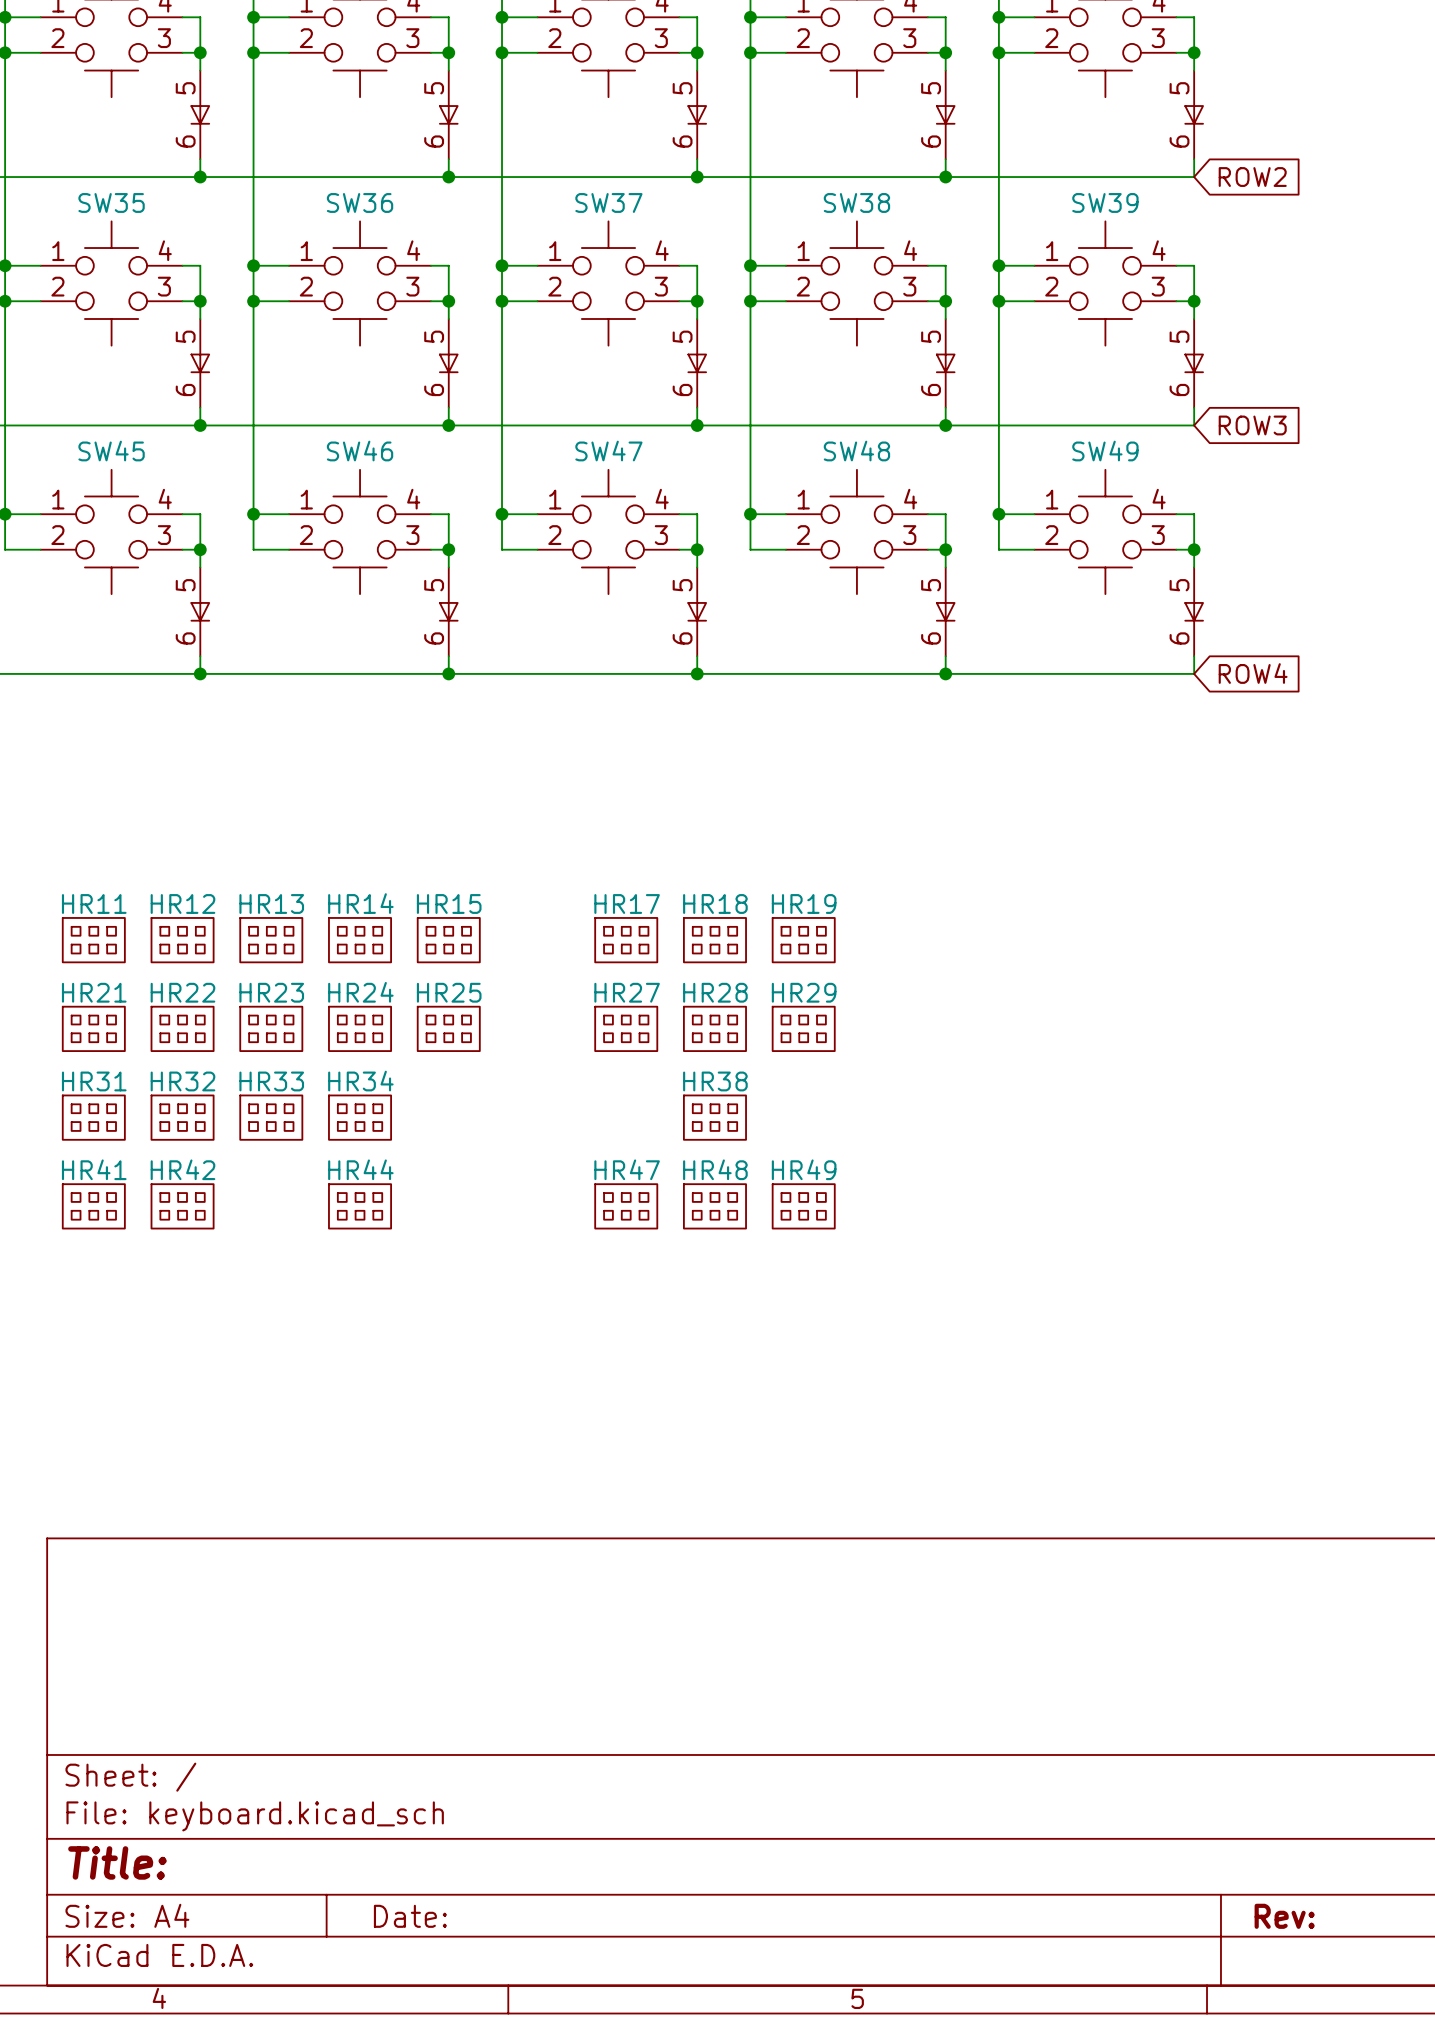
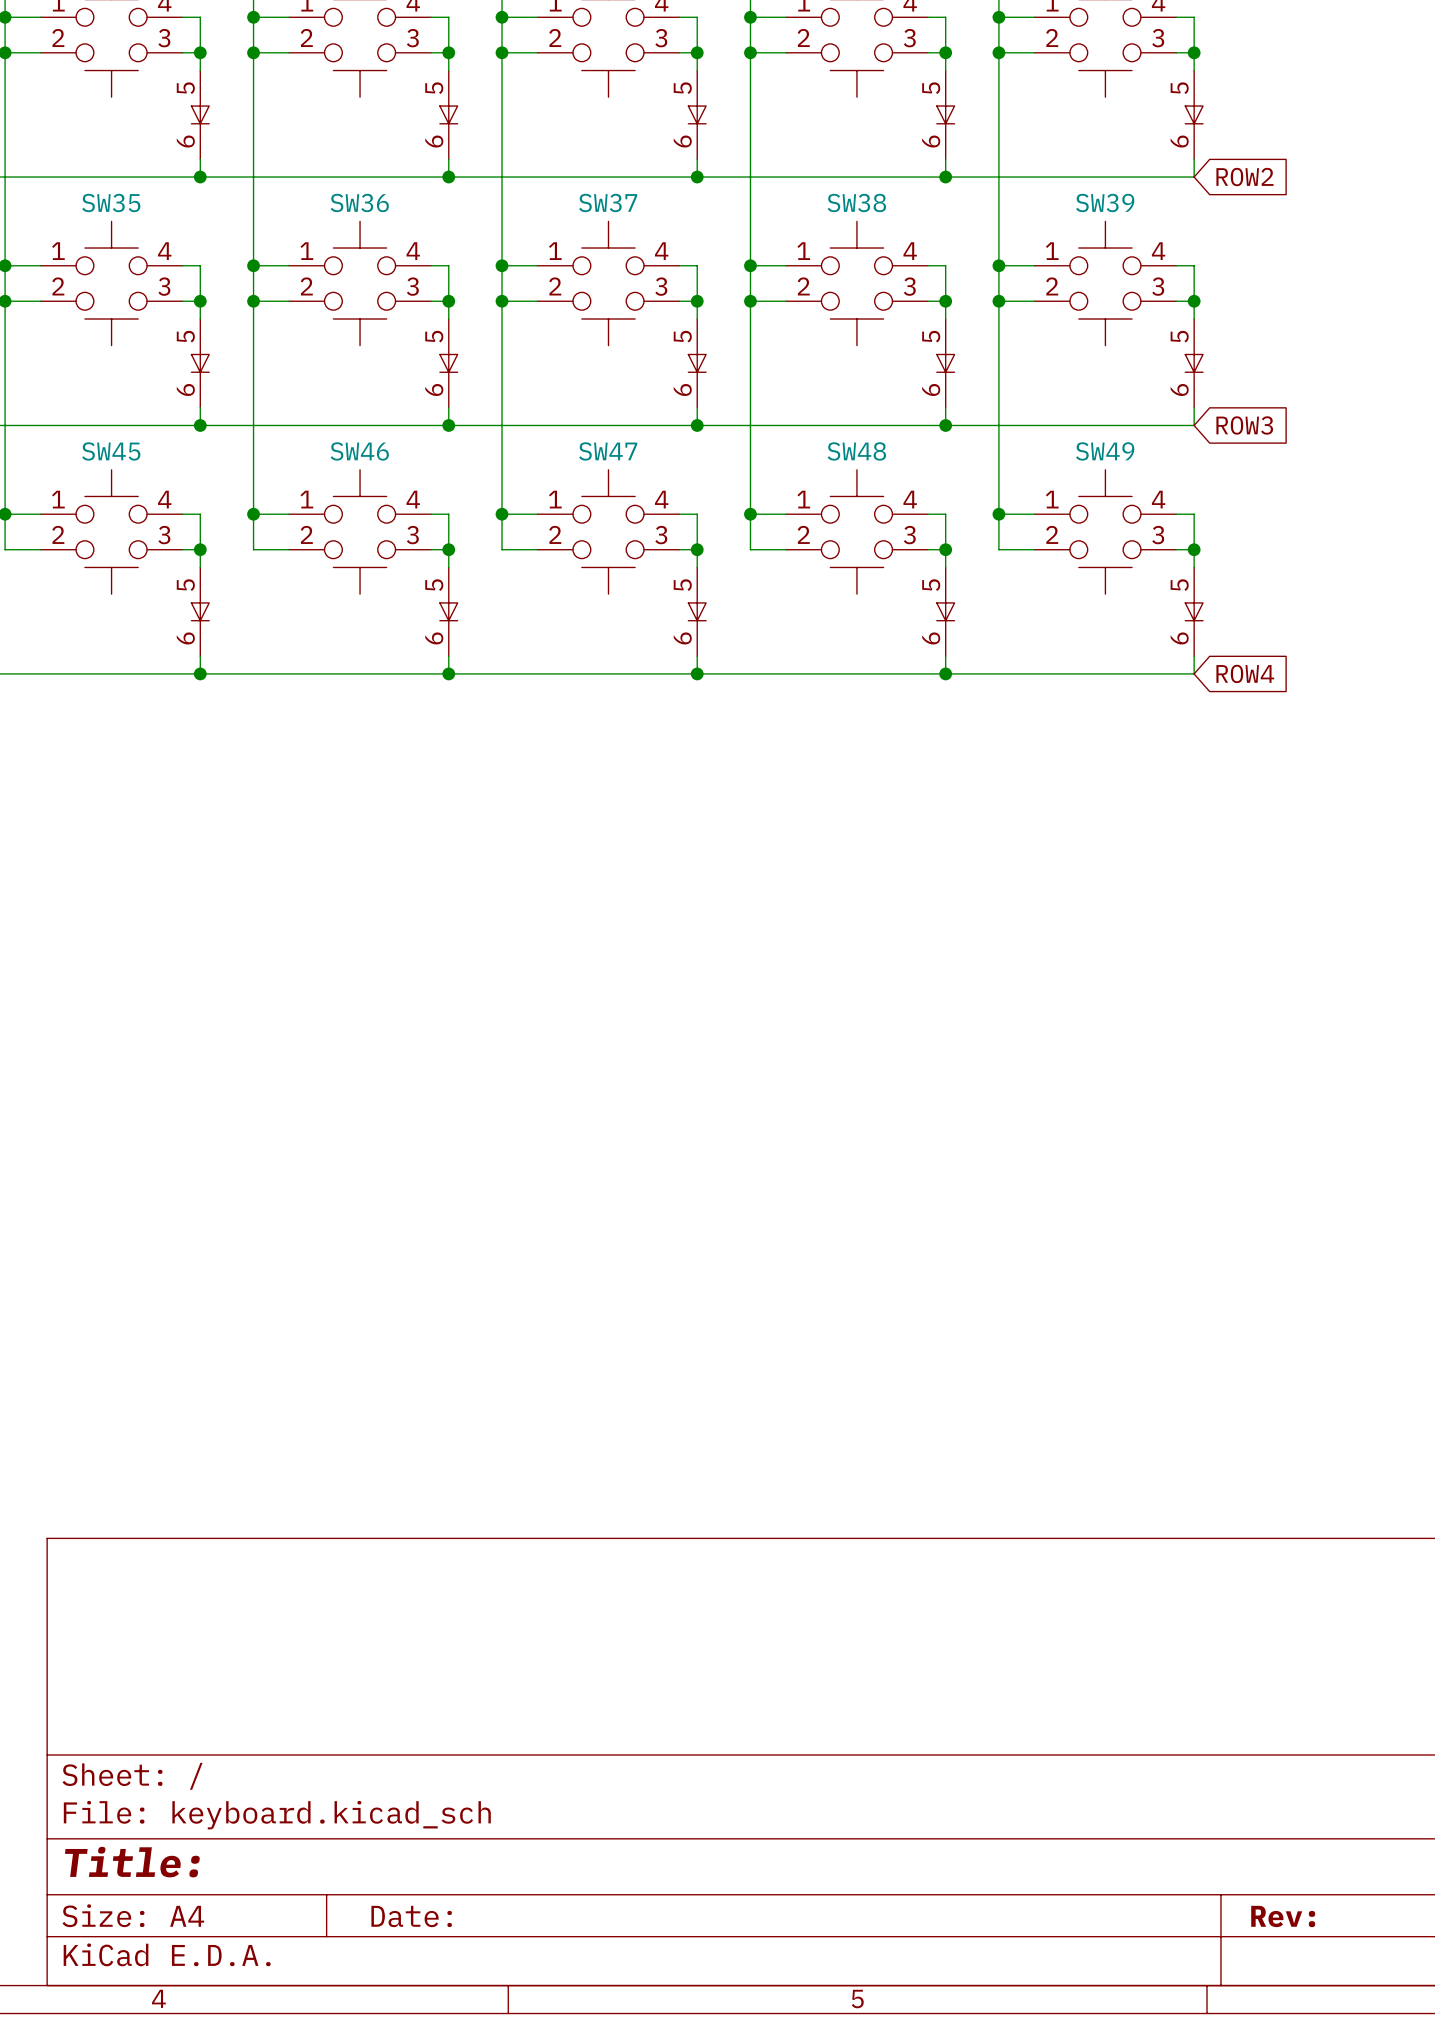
HR11: (93, 940) -> none
HR12: (182, 940) -> none
HR13: (271, 940) -> none
HR14: (360, 940) -> none
HR15: (448, 940) -> none
HR17: (626, 940) -> none
HR18: (714, 940) -> none
HR19: (803, 940) -> none
HR21: (93, 1028) -> none
HR22: (182, 1028) -> none
HR23: (271, 1028) -> none
HR24: (360, 1028) -> none
HR25: (448, 1028) -> none
HR27: (626, 1028) -> none
HR28: (714, 1028) -> none
HR29: (803, 1028) -> none
HR31: (93, 1117) -> none
HR32: (182, 1117) -> none
HR33: (271, 1117) -> none
HR34: (360, 1117) -> none
HR38: (714, 1117) -> none
HR41: (93, 1206) -> none
HR42: (182, 1206) -> none
HR44: (360, 1206) -> none
HR47: (626, 1206) -> none
HR48: (714, 1206) -> none
HR49: (803, 1206) -> none

